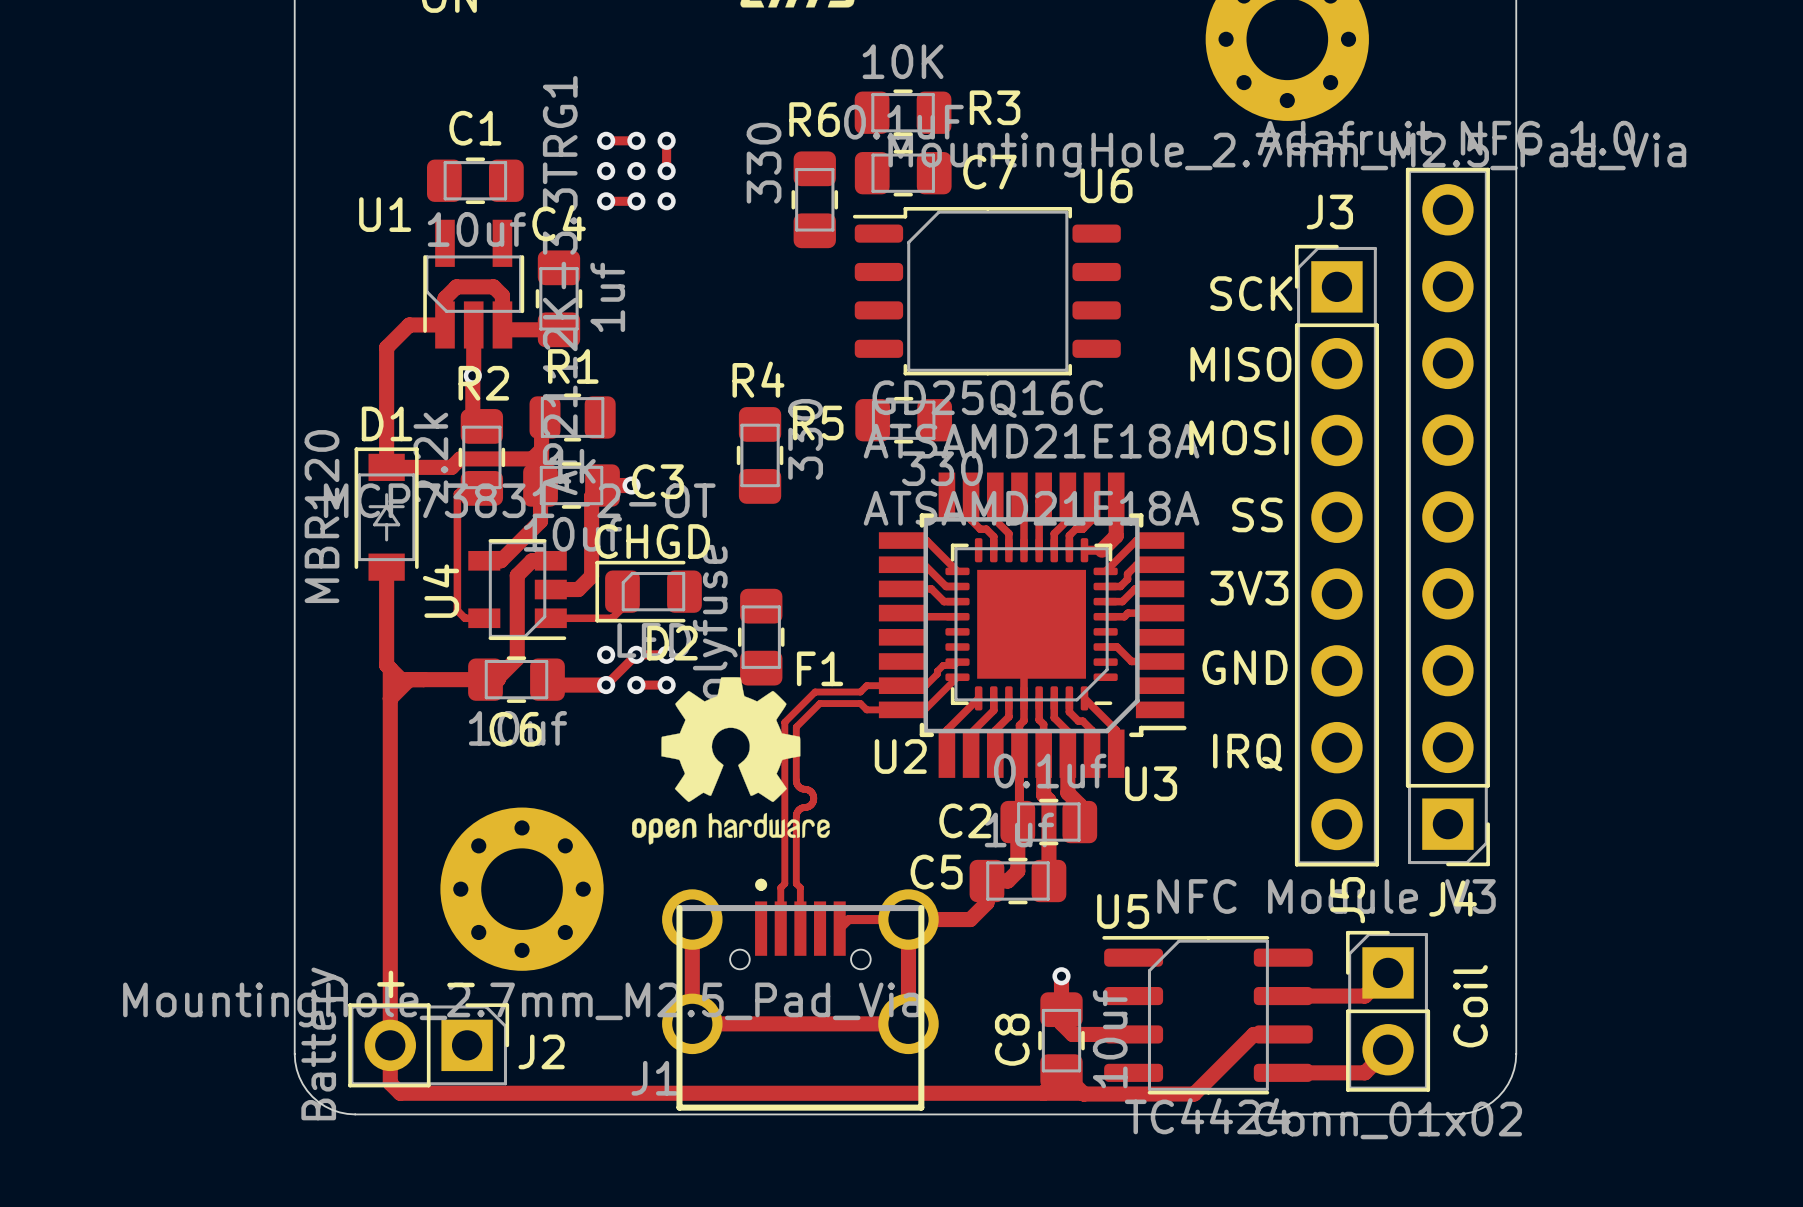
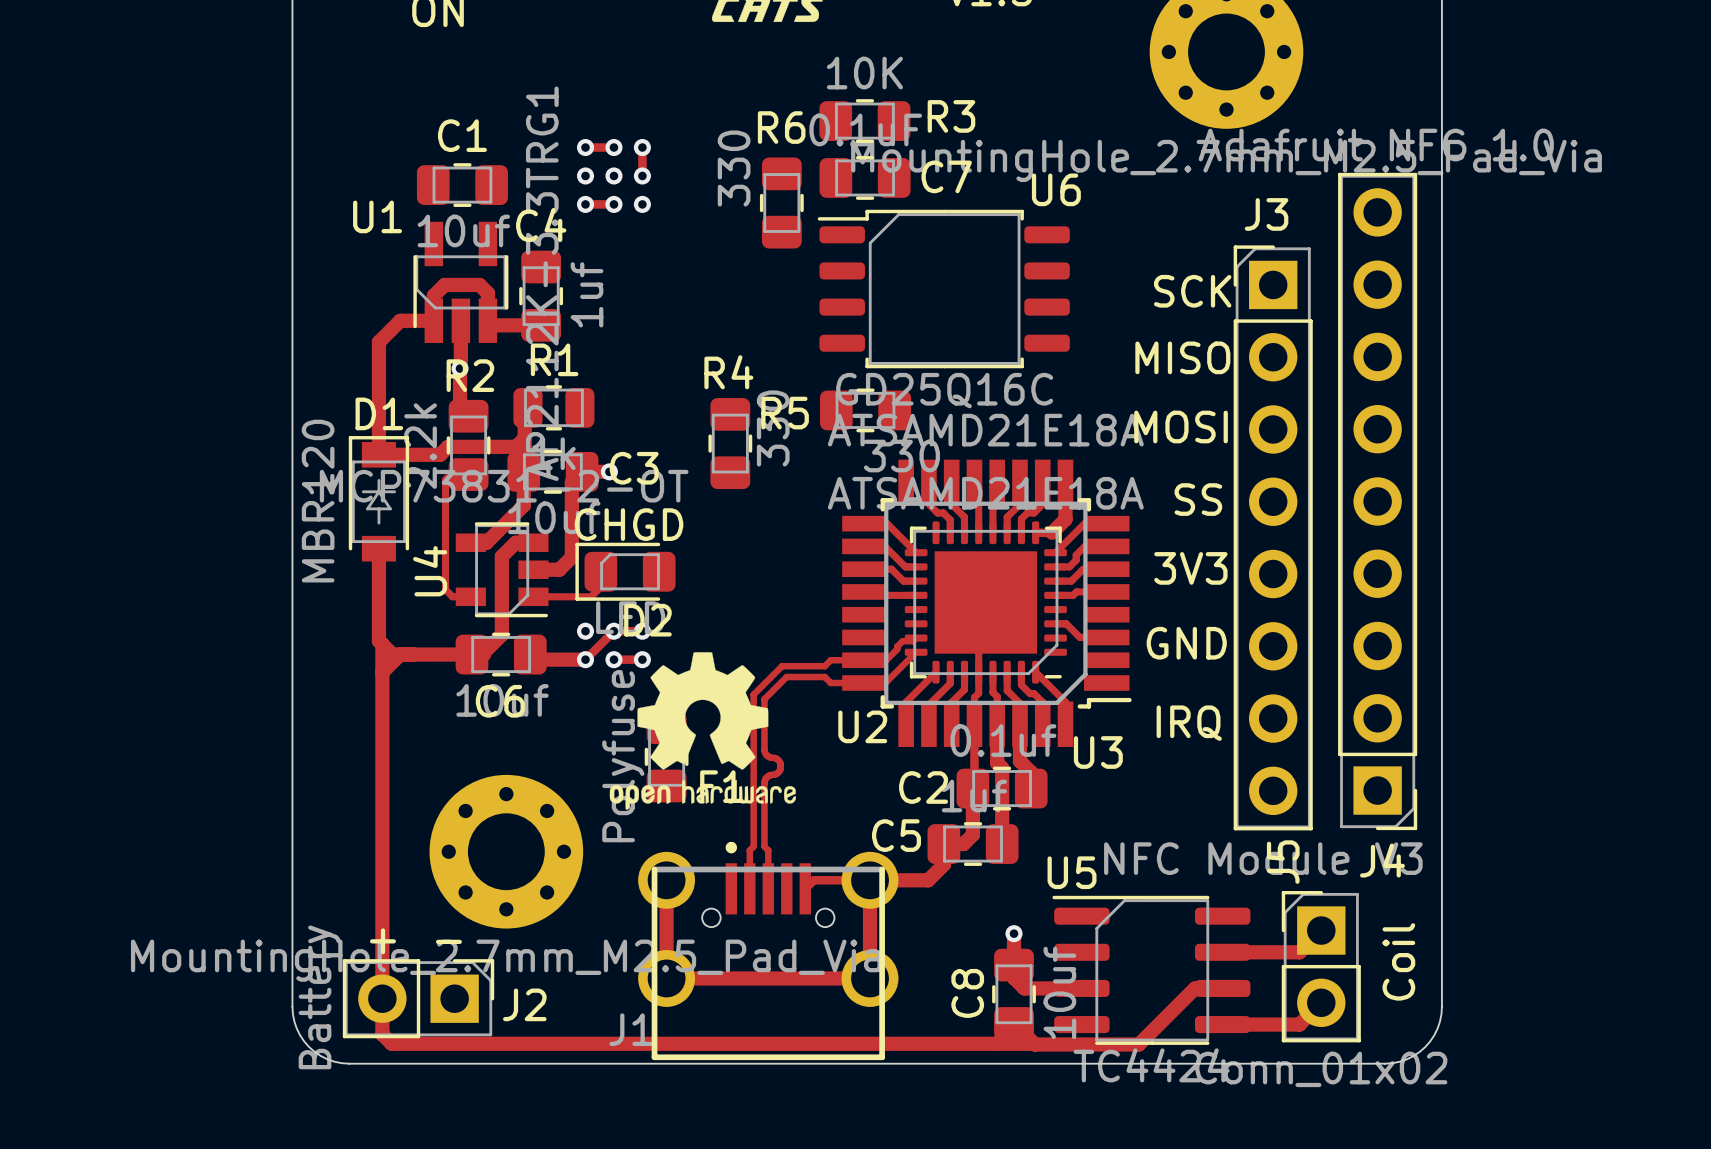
F1 position: (761, 637) -> (666, 756)

